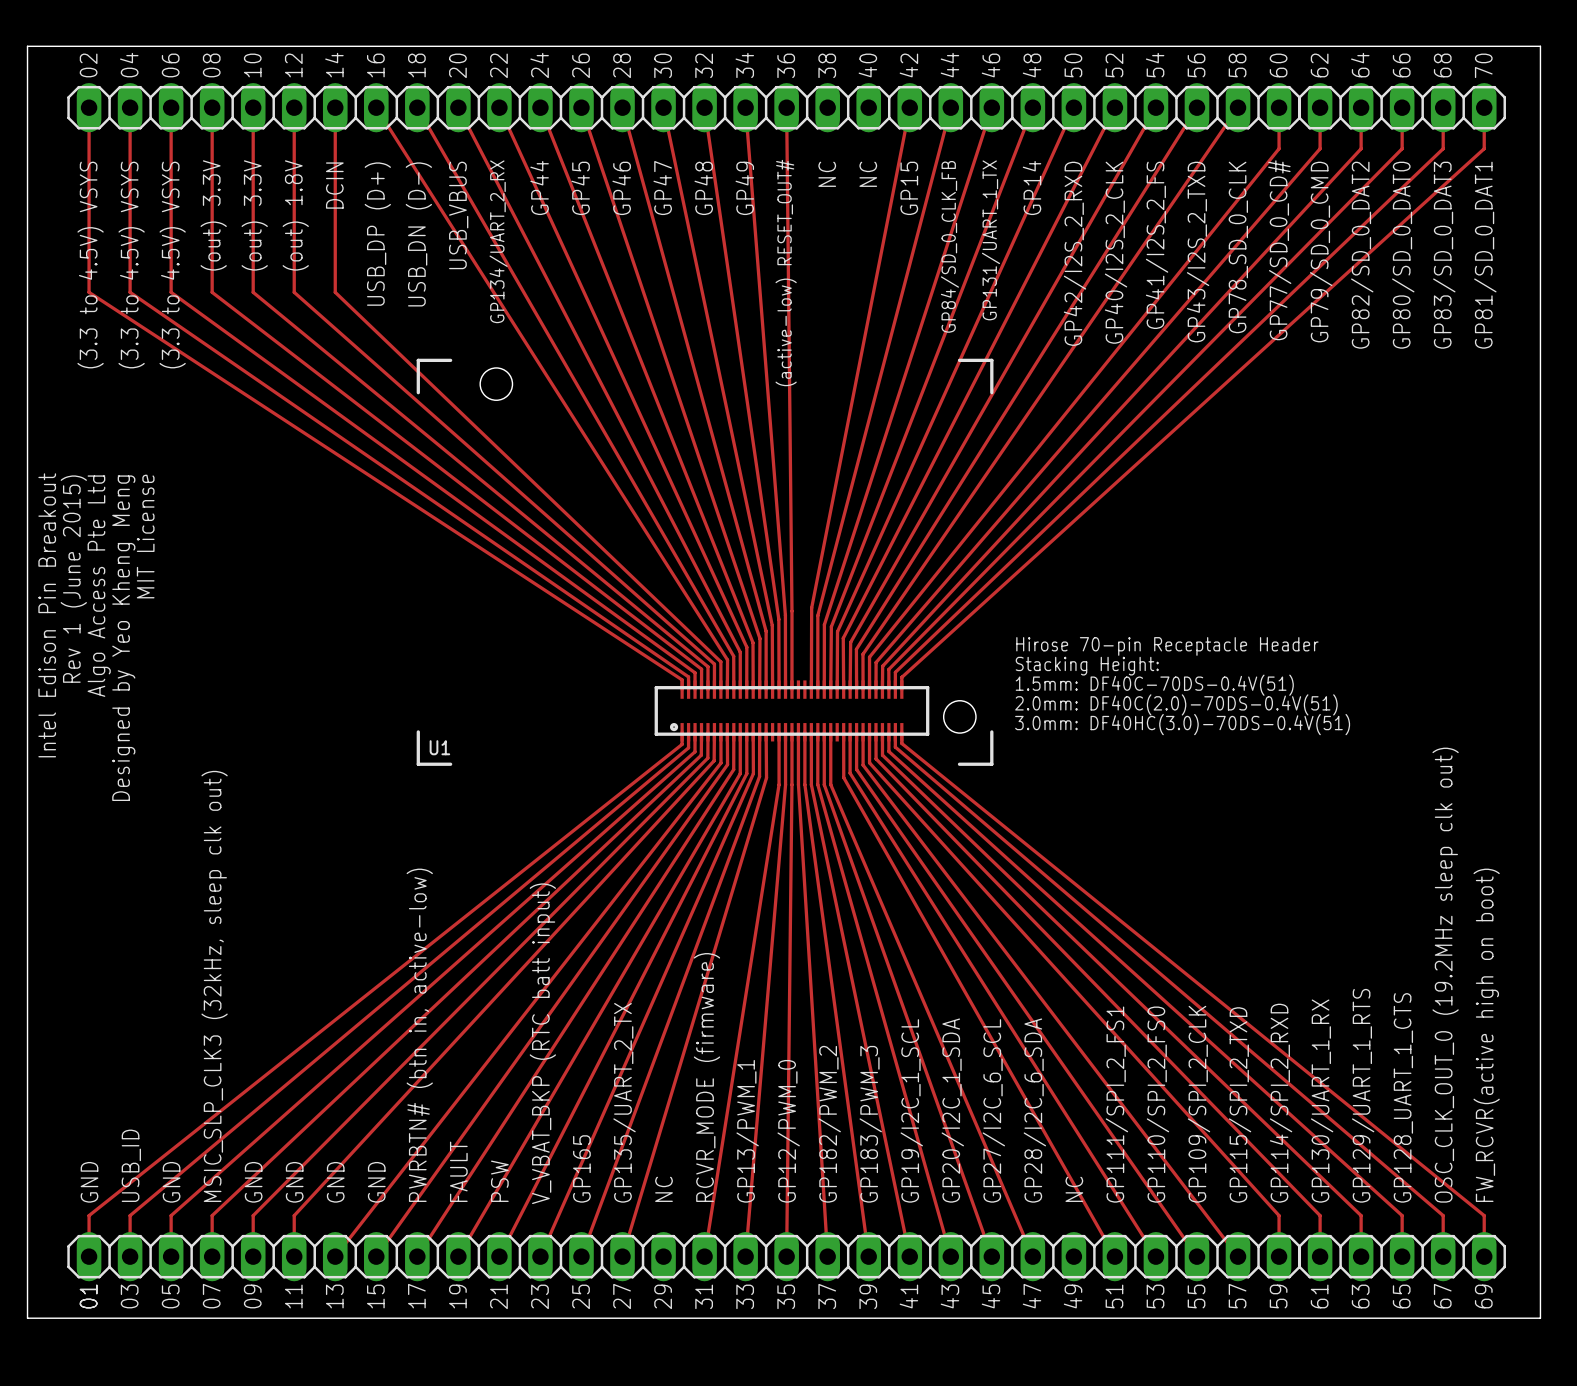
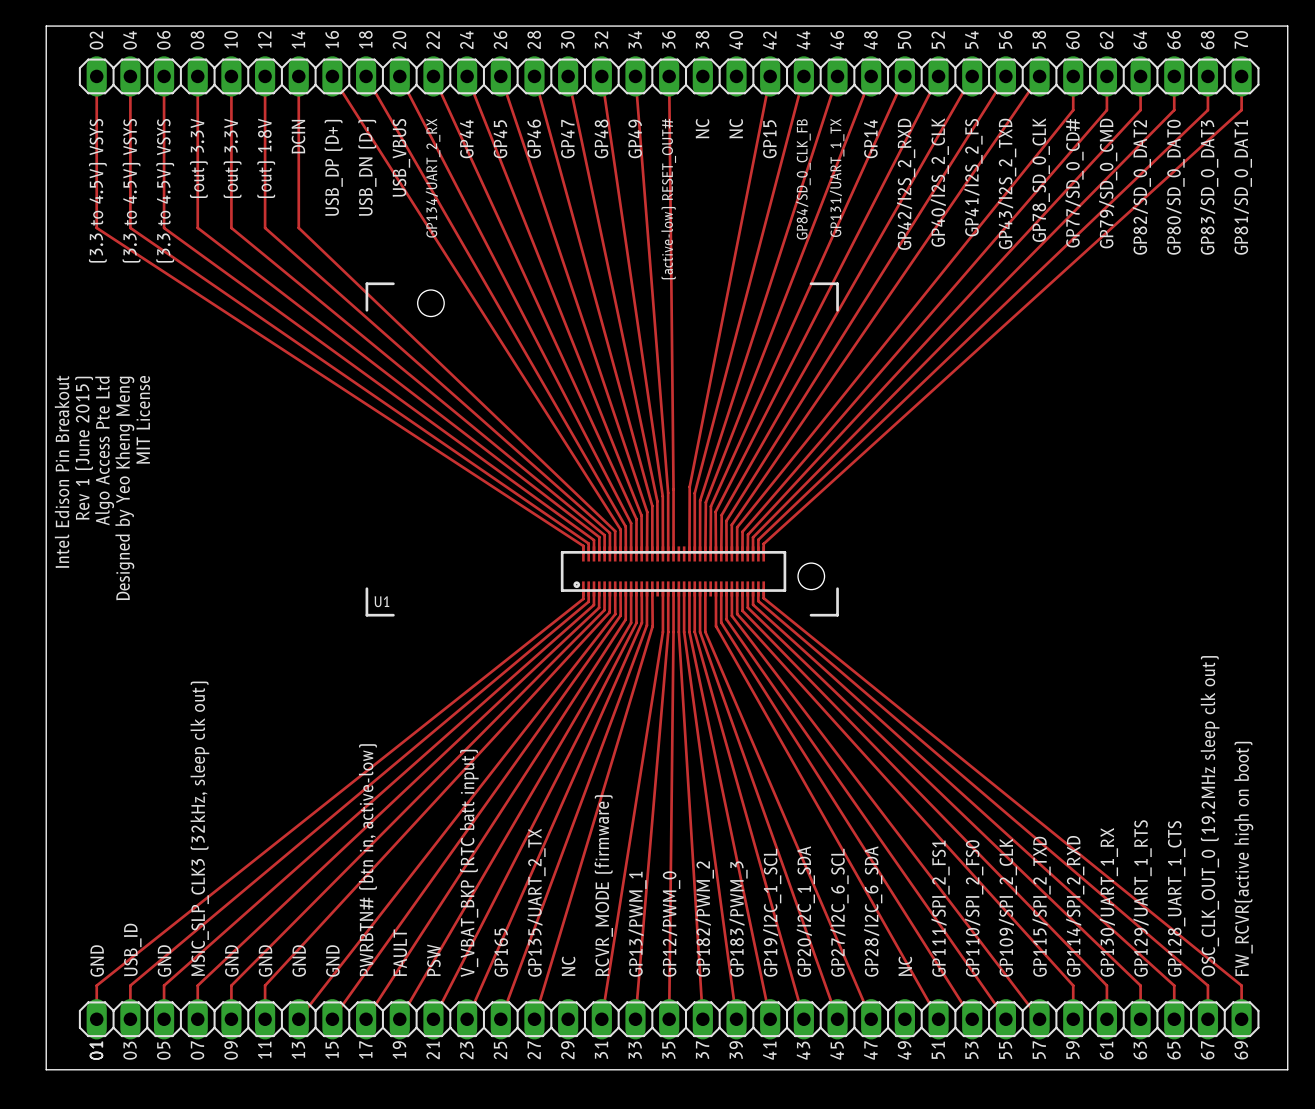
text: Hirose 70-pin Receptacle Header (1167, 646) -> none
text: Stacking Height: (1087, 666) -> none
text: 1.5mm: DF40C-70DS-0.4V(51) (1154, 685) -> none
text: 2.0mm: DF40C(2.0)-70DS-0.4V(51) (1176, 704) -> none
text: 3.0mm: DF40HC(3.0)-70DS-0.4V(51) (1182, 724) -> none

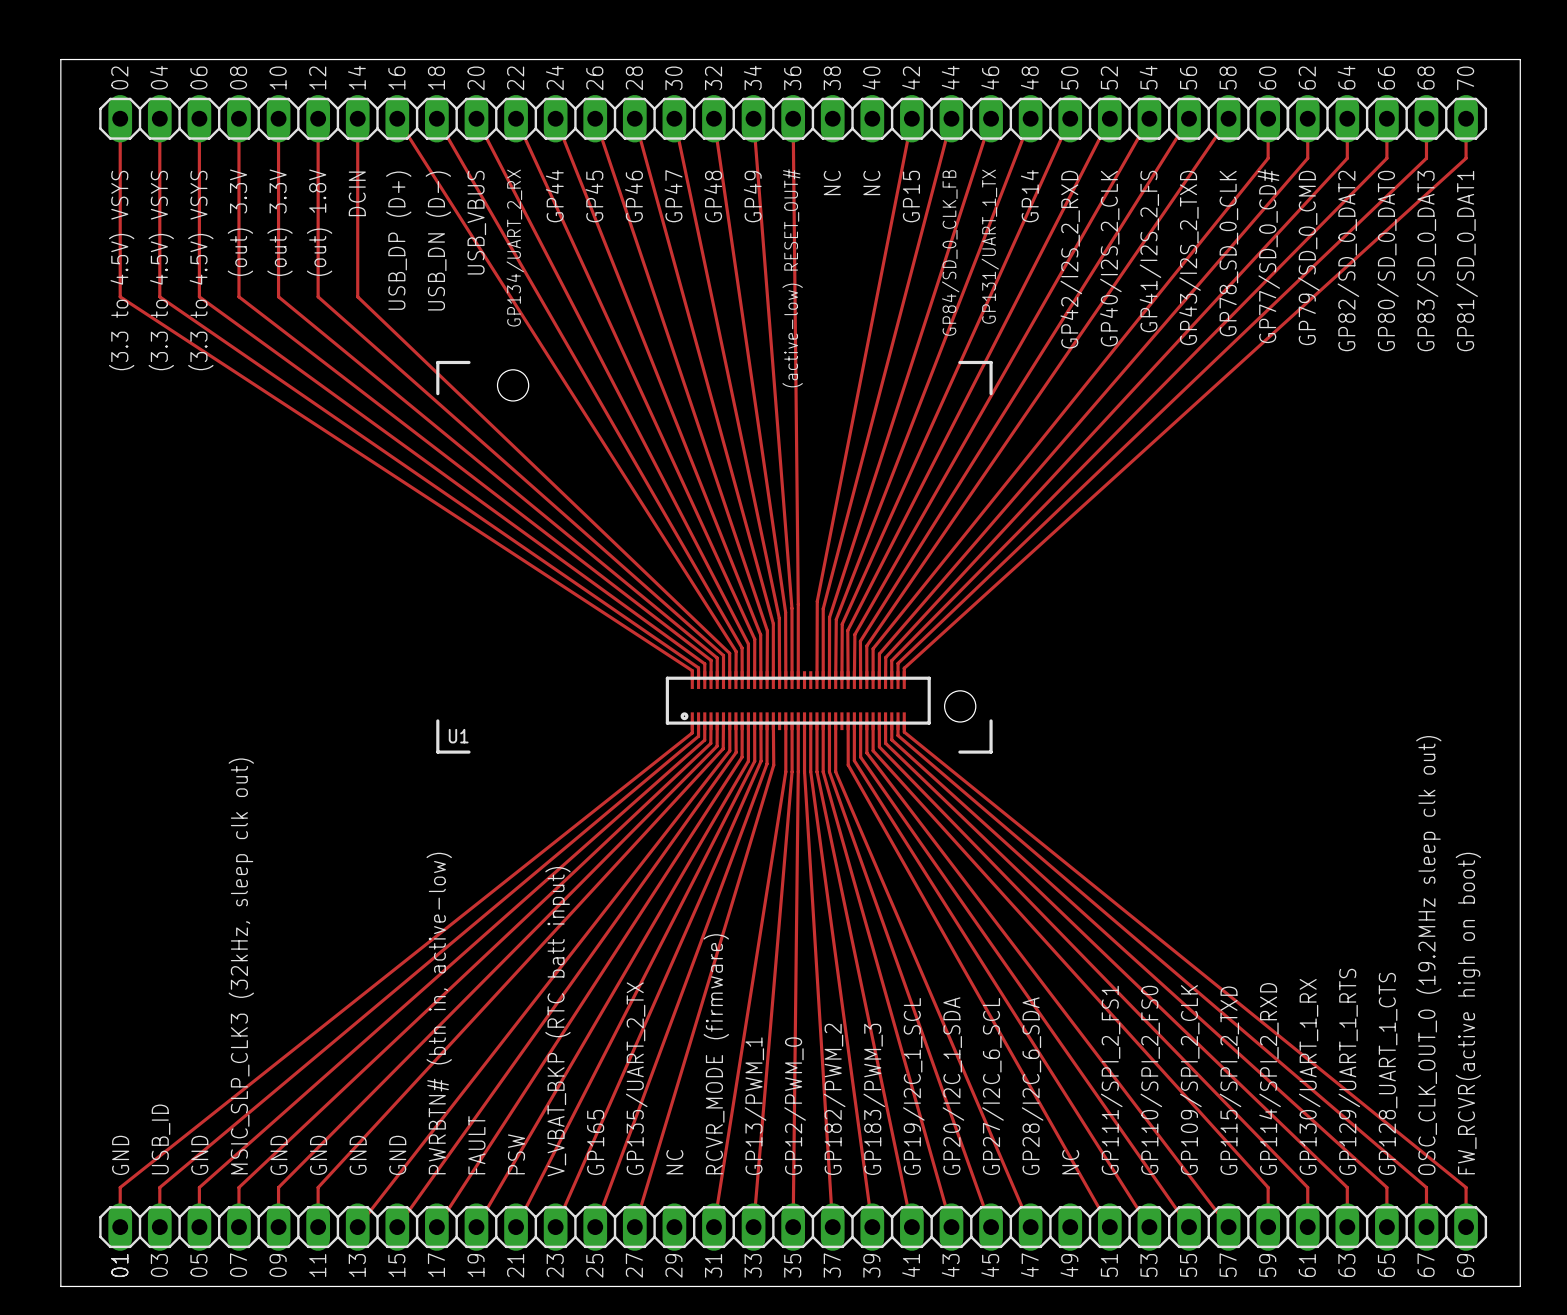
text: MIT License (143, 419) -> none
text: Rev 1 (June 2015) (84, 448) -> none
text: Algo Access Pte Ltd (104, 450) -> none
text: Intel Edison Pin Breakout (62, 471) -> none
text: Designed by Yeo Kheng Meng (124, 488) -> none

